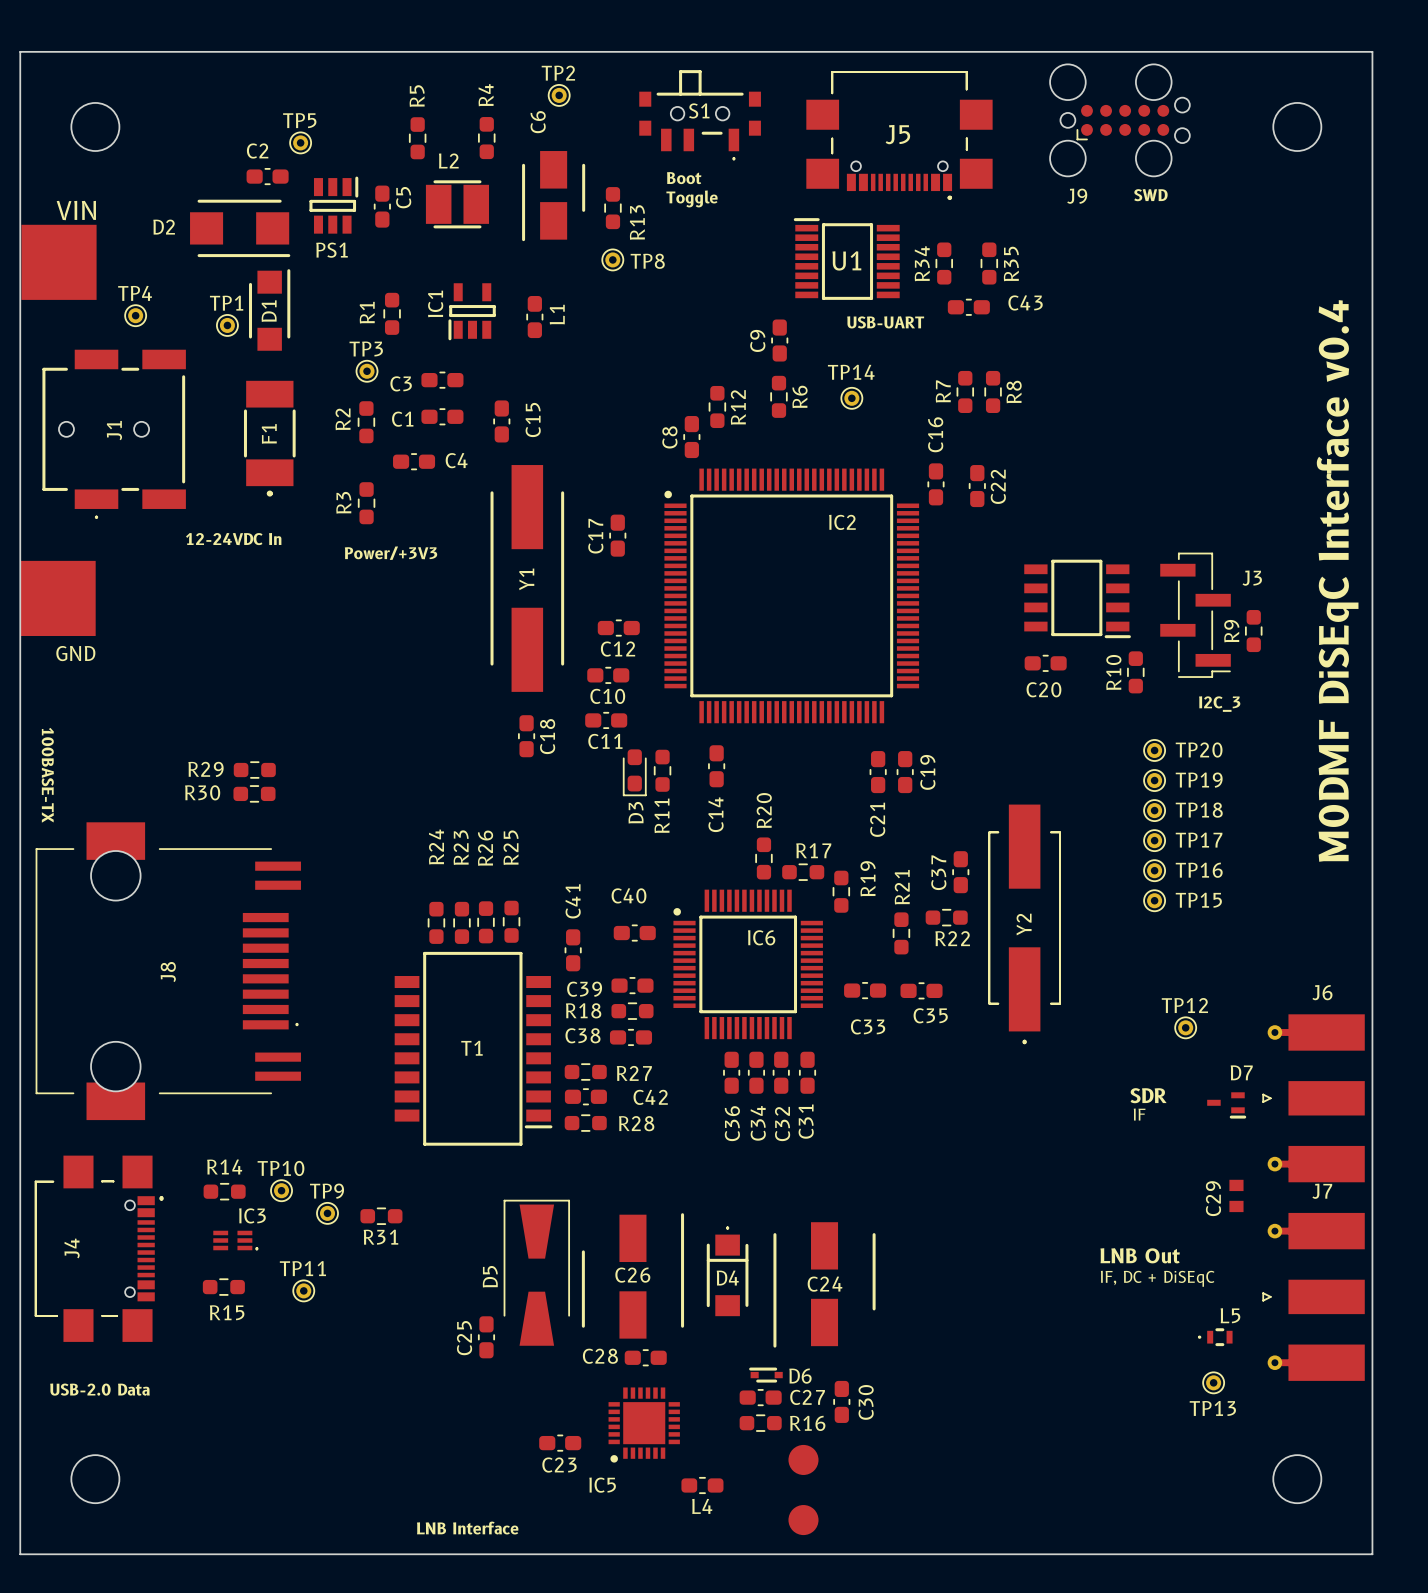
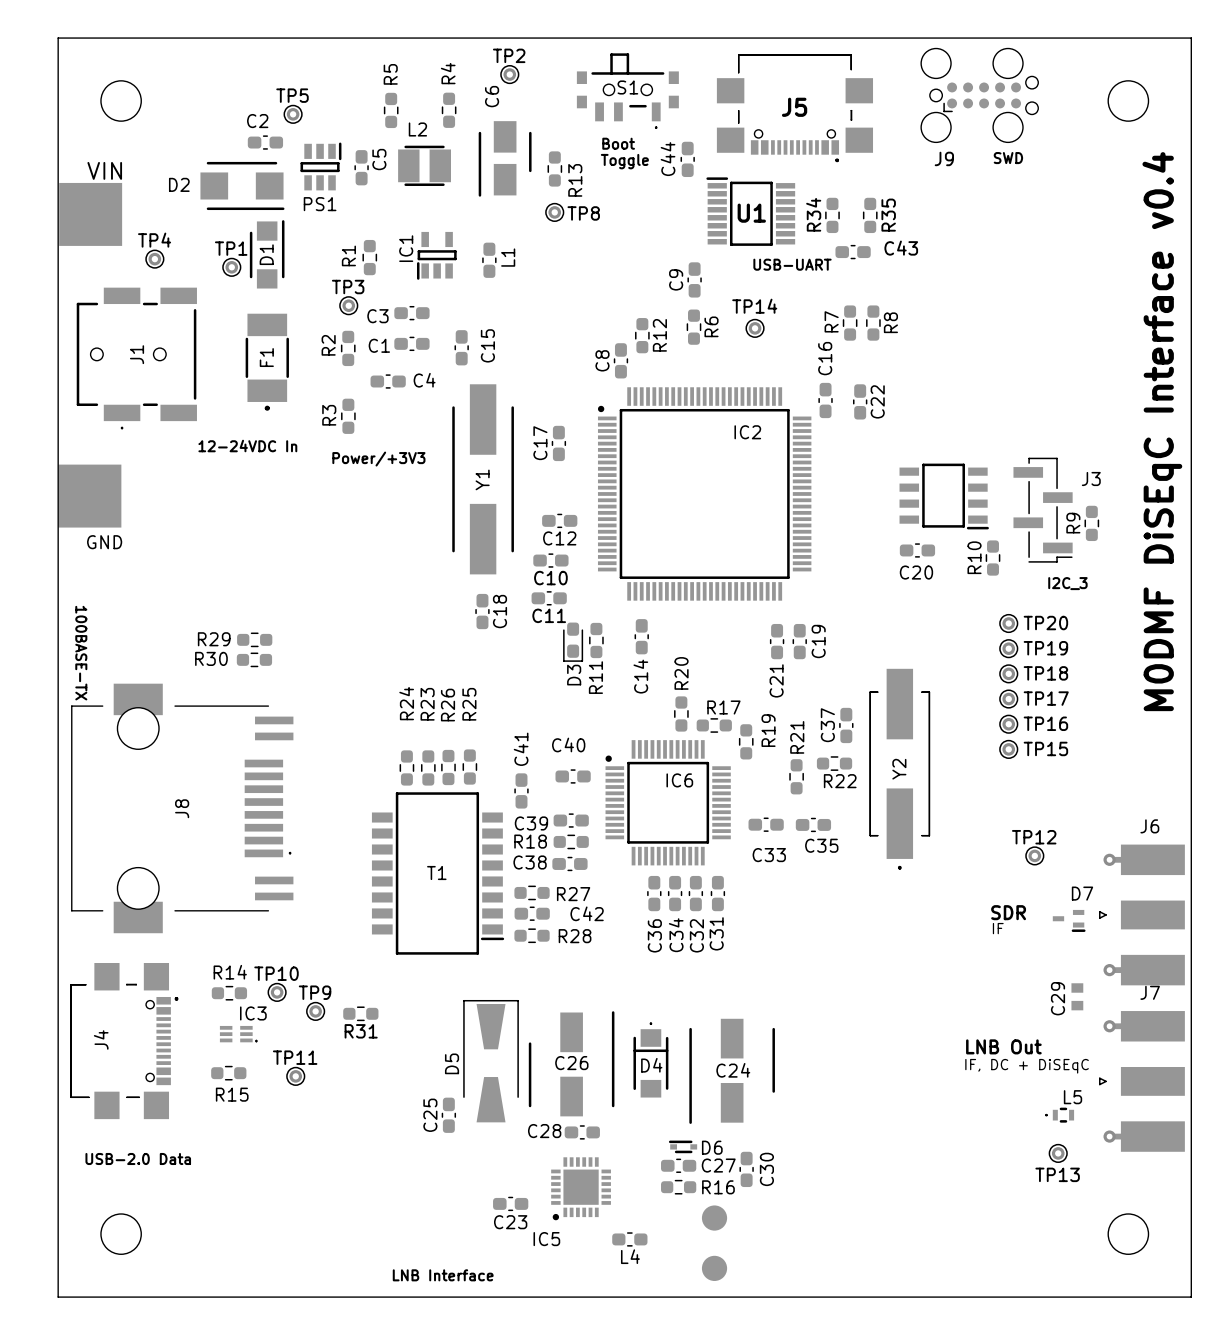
C44: none -> (687, 159)

